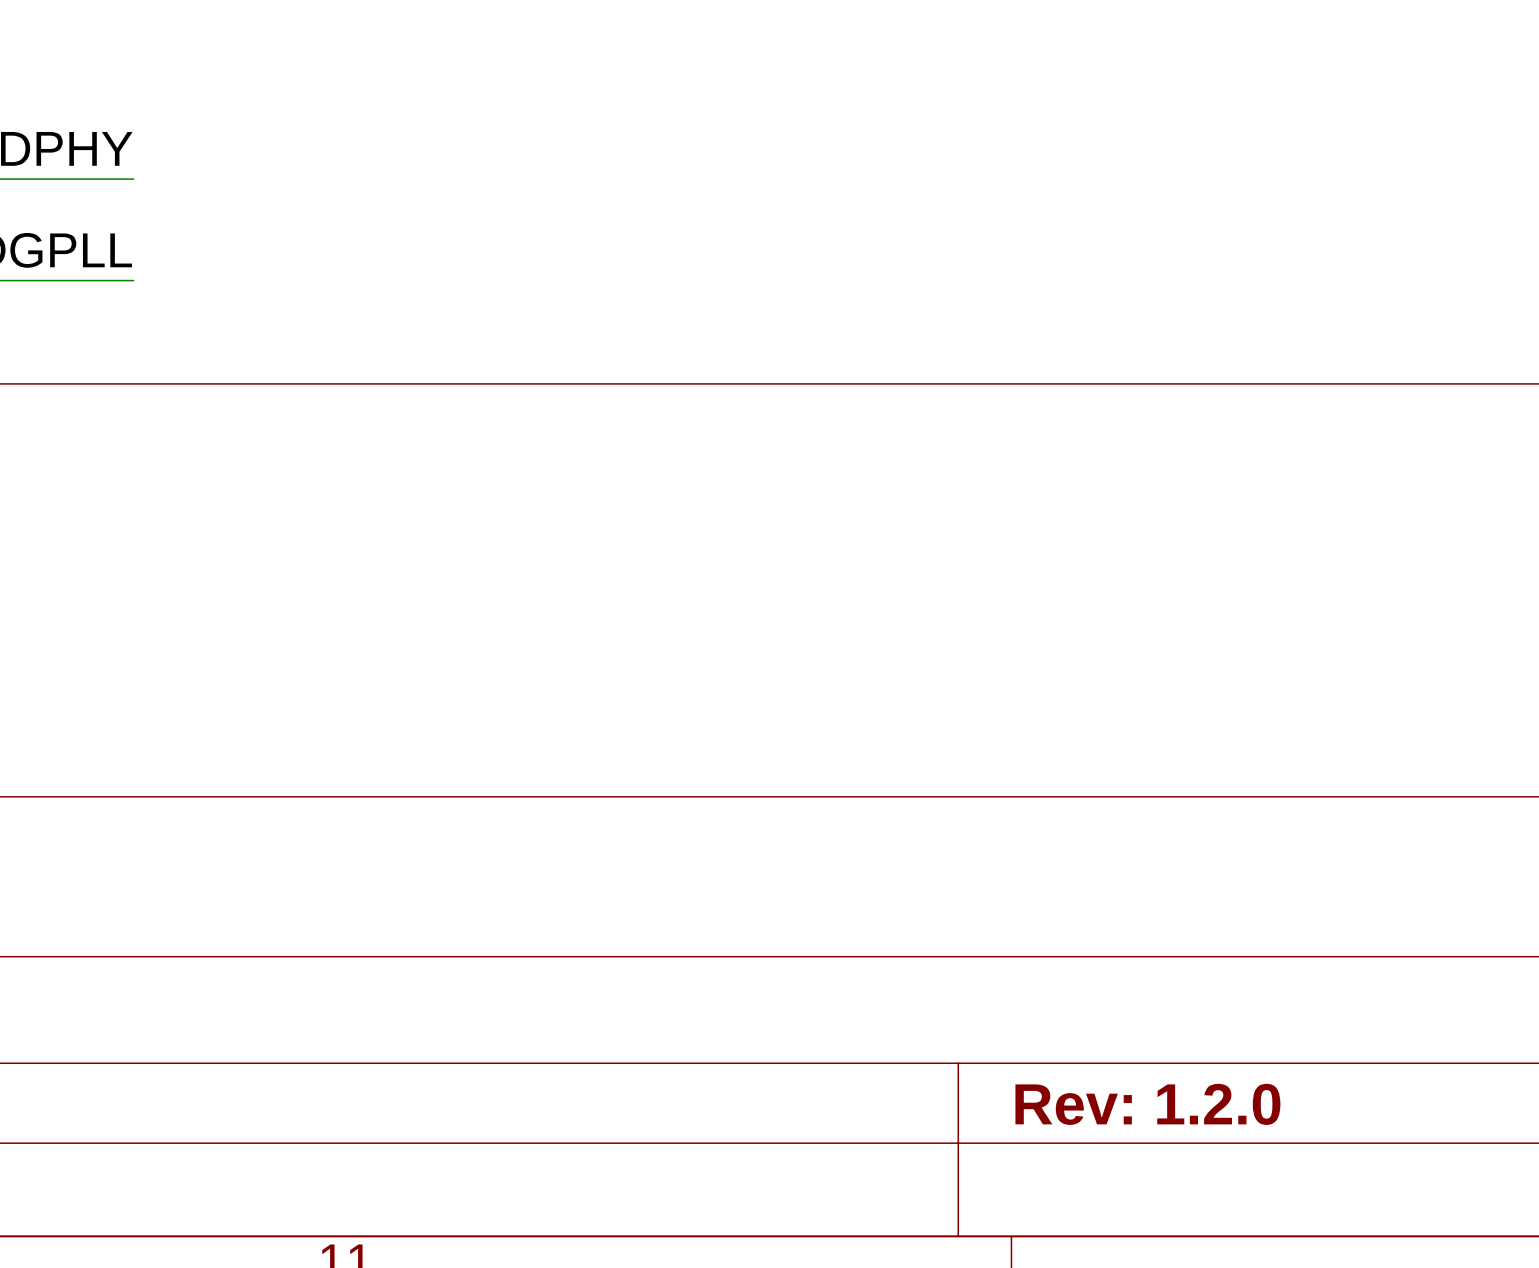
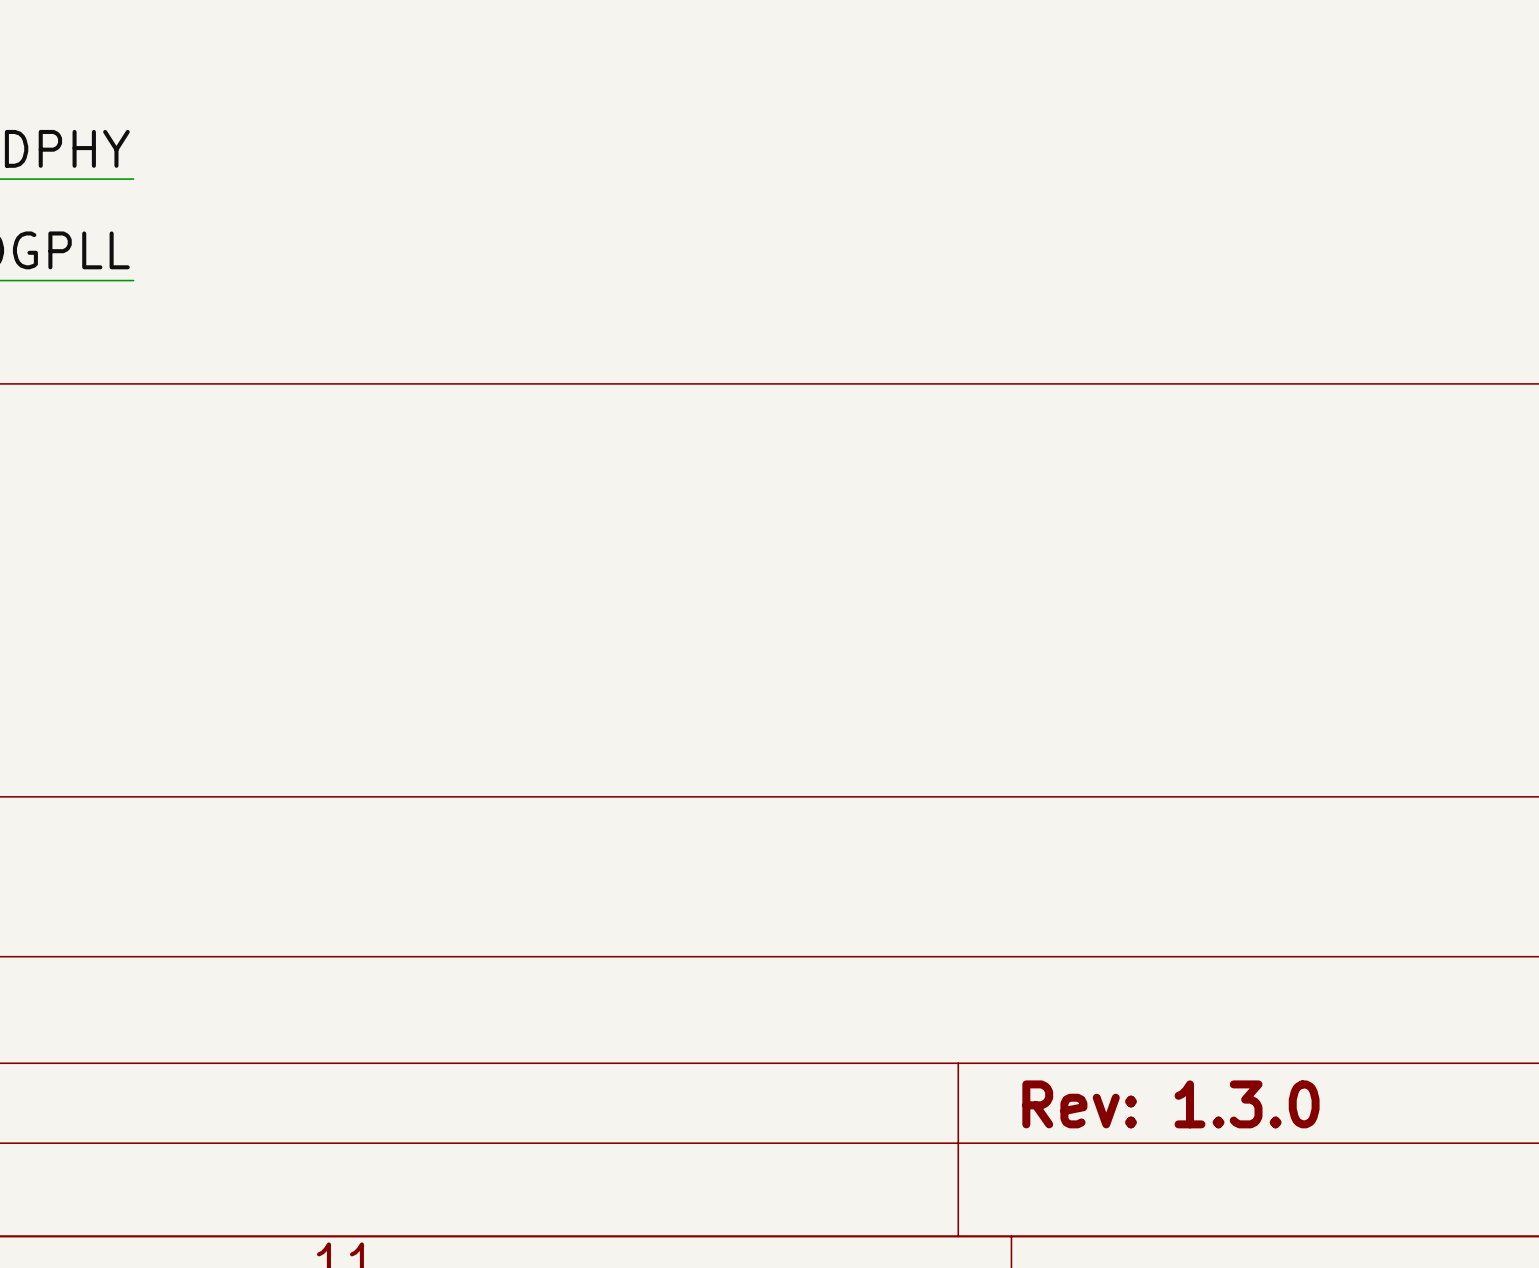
title block: Rev: 1.2.0 (1147, 1104) -> Rev: 1.3.0 (1170, 1104)

